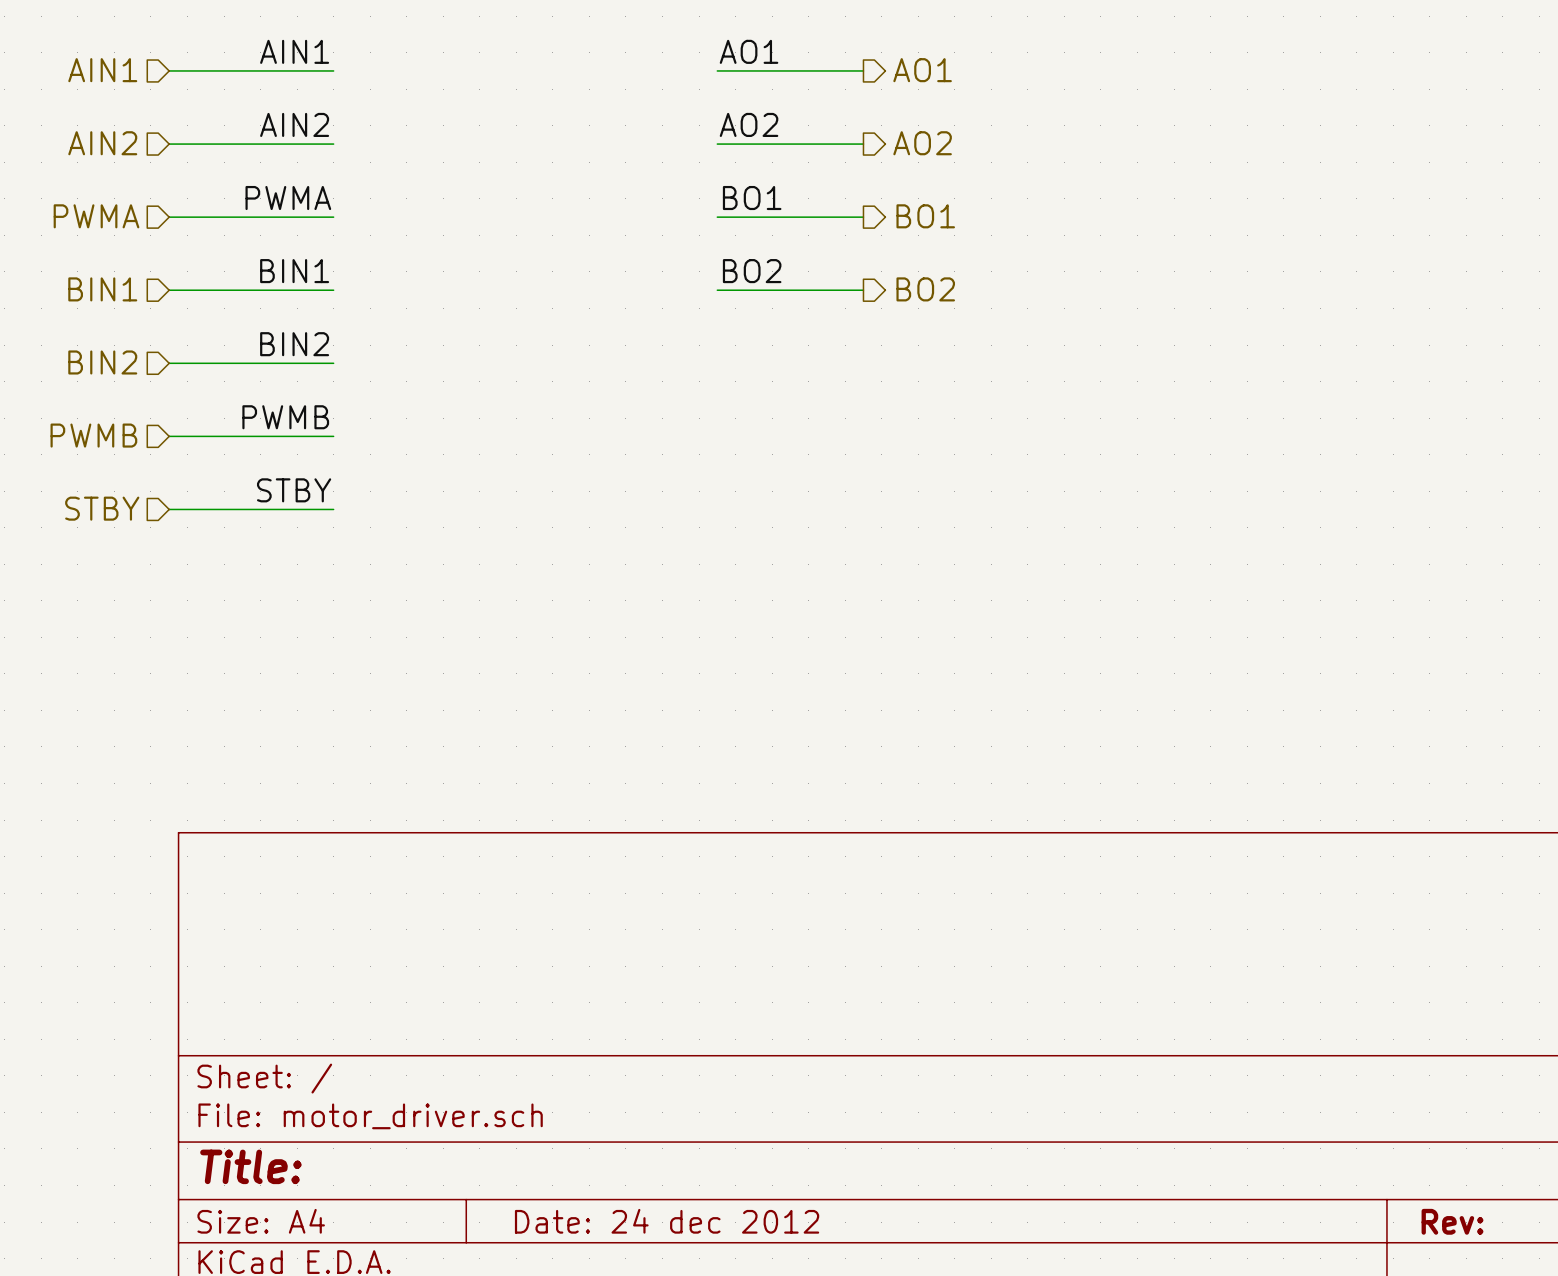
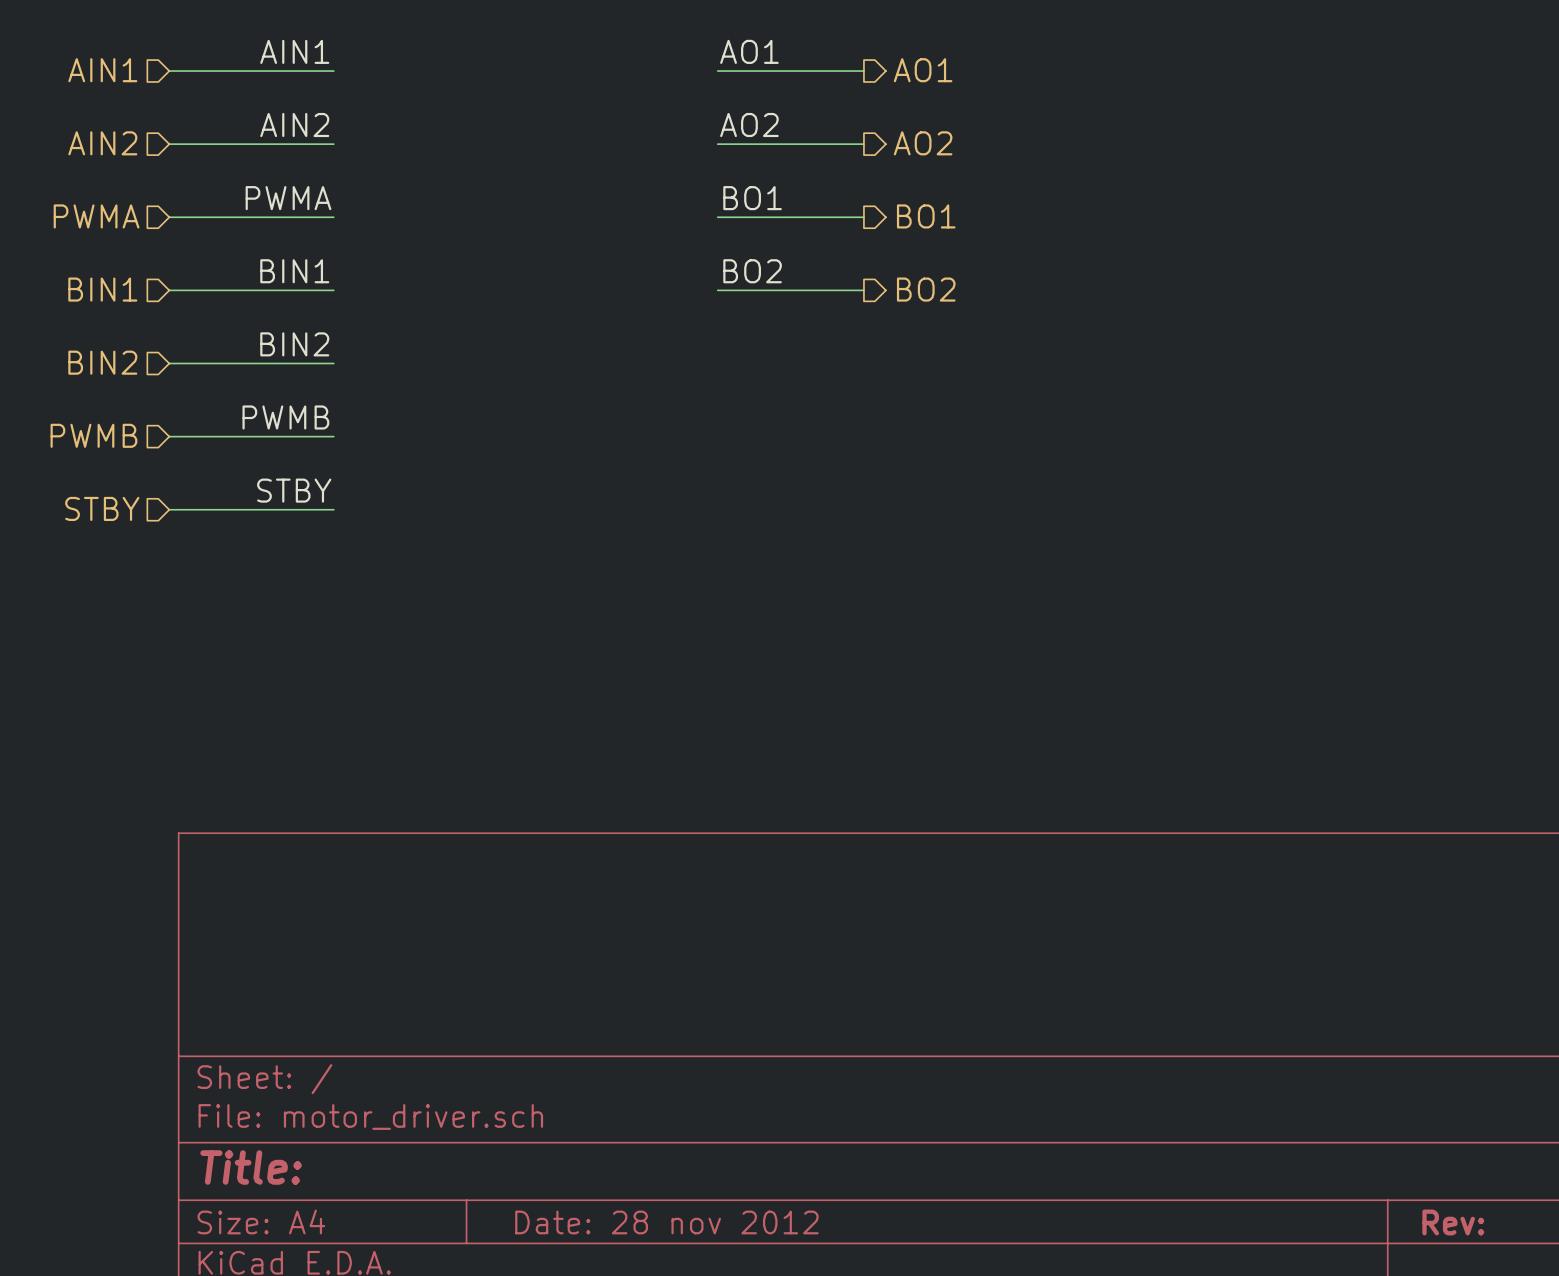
title block: Date: 24 dec 2012 (667, 1221) -> Date: 28 nov 2012 (666, 1222)

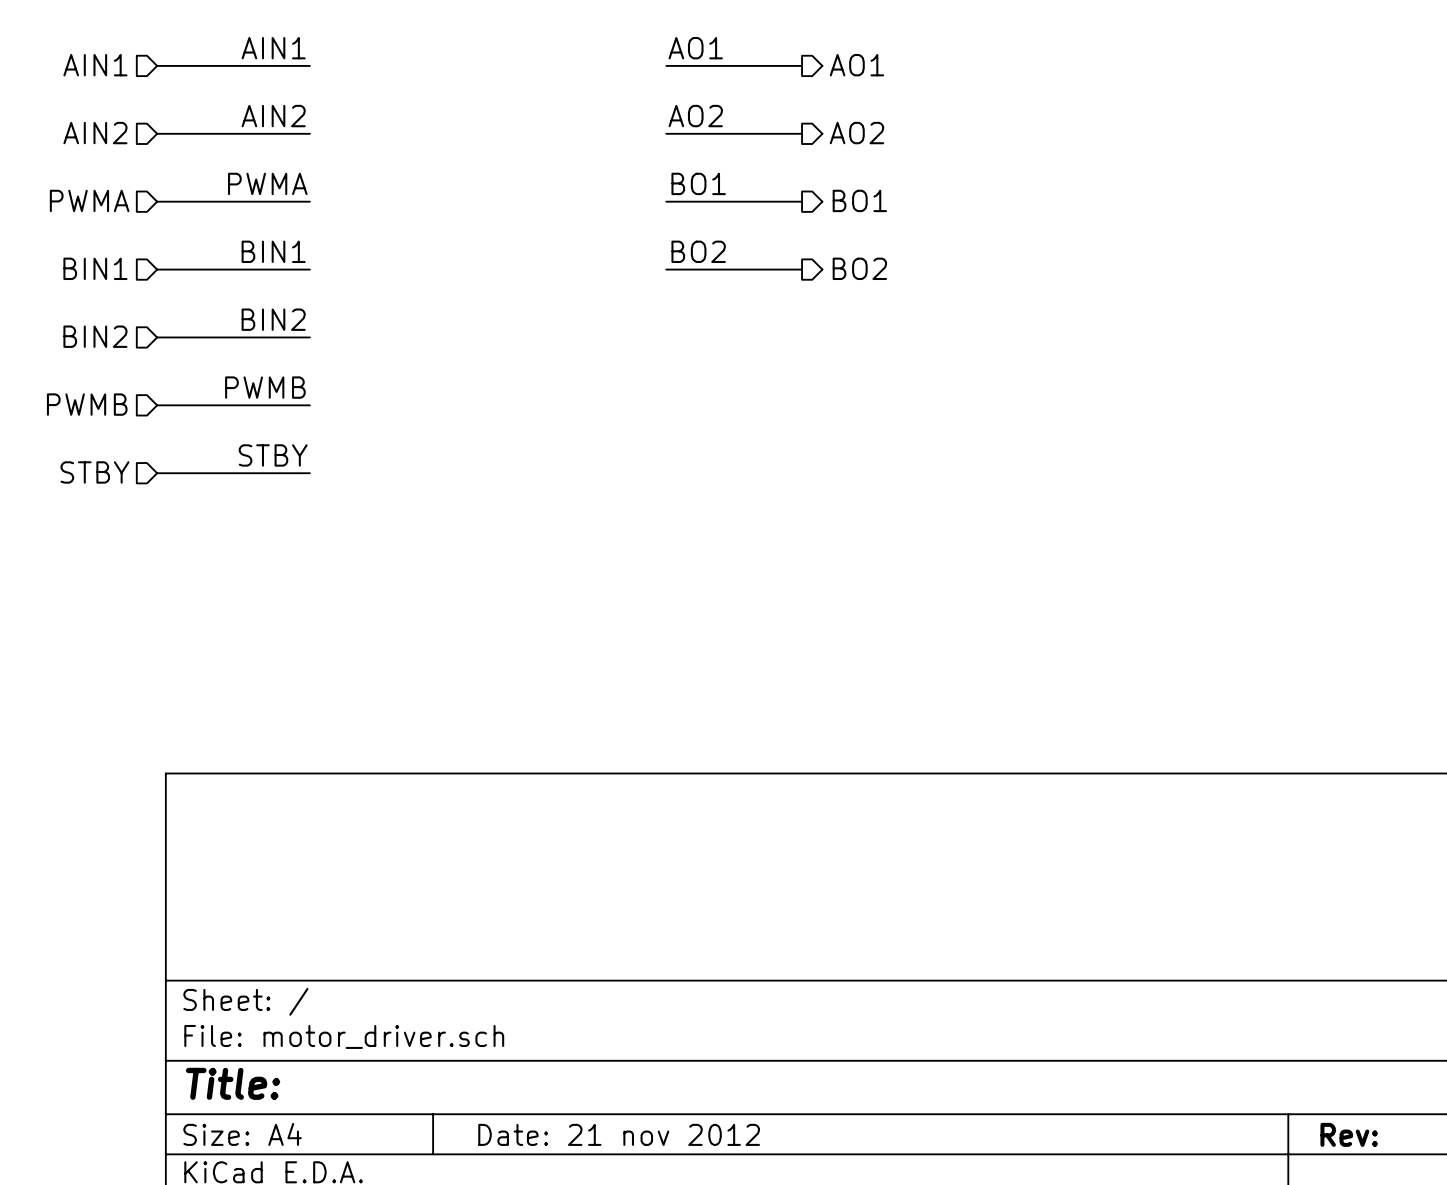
title block: Date: 28 nov 2012 (666, 1222) -> Date: 21 nov 2012 (619, 1134)

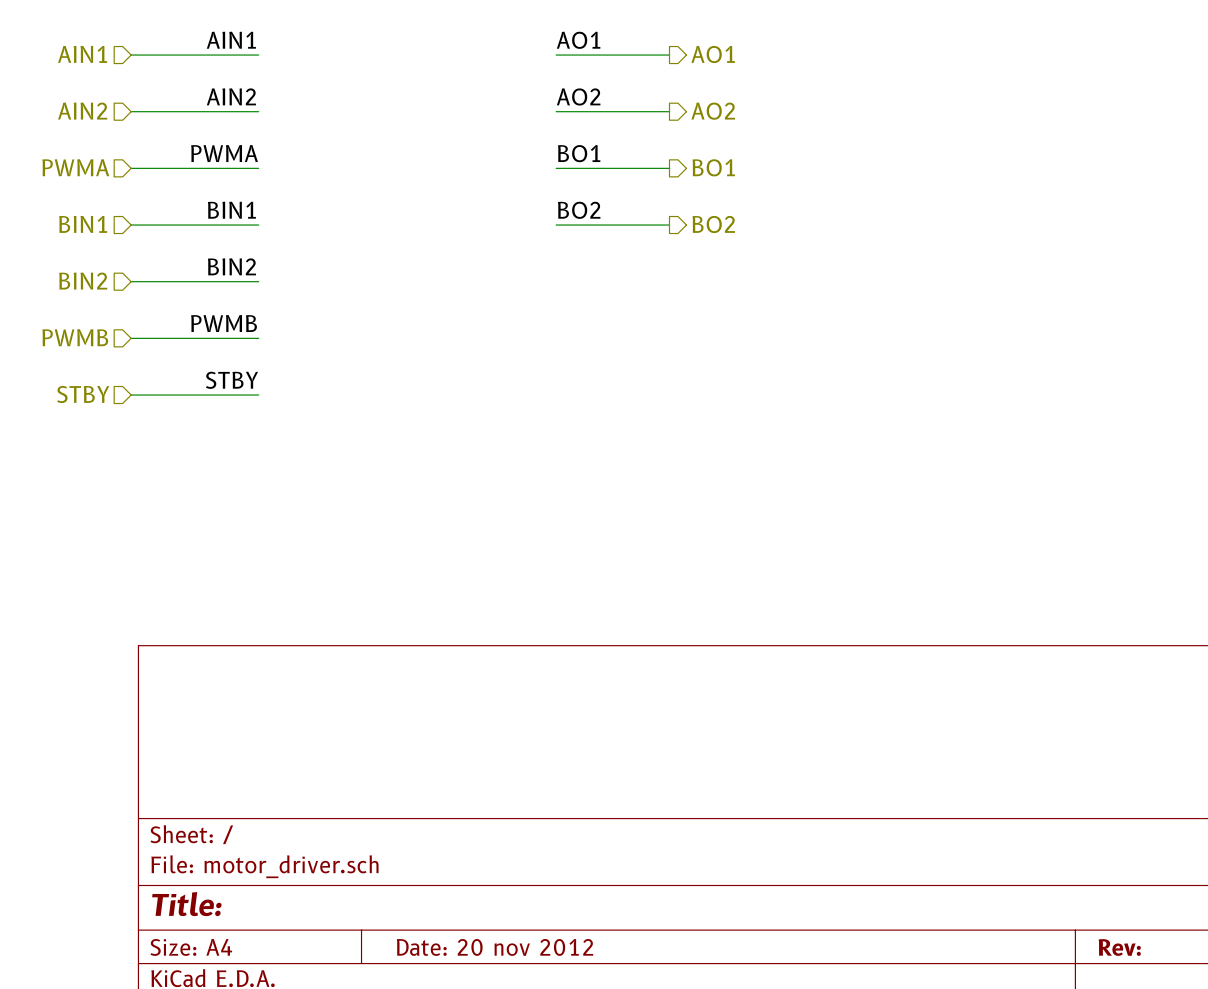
title block: Date: 21 nov 2012 (619, 1134) -> Date: 20 nov 2012 (495, 947)

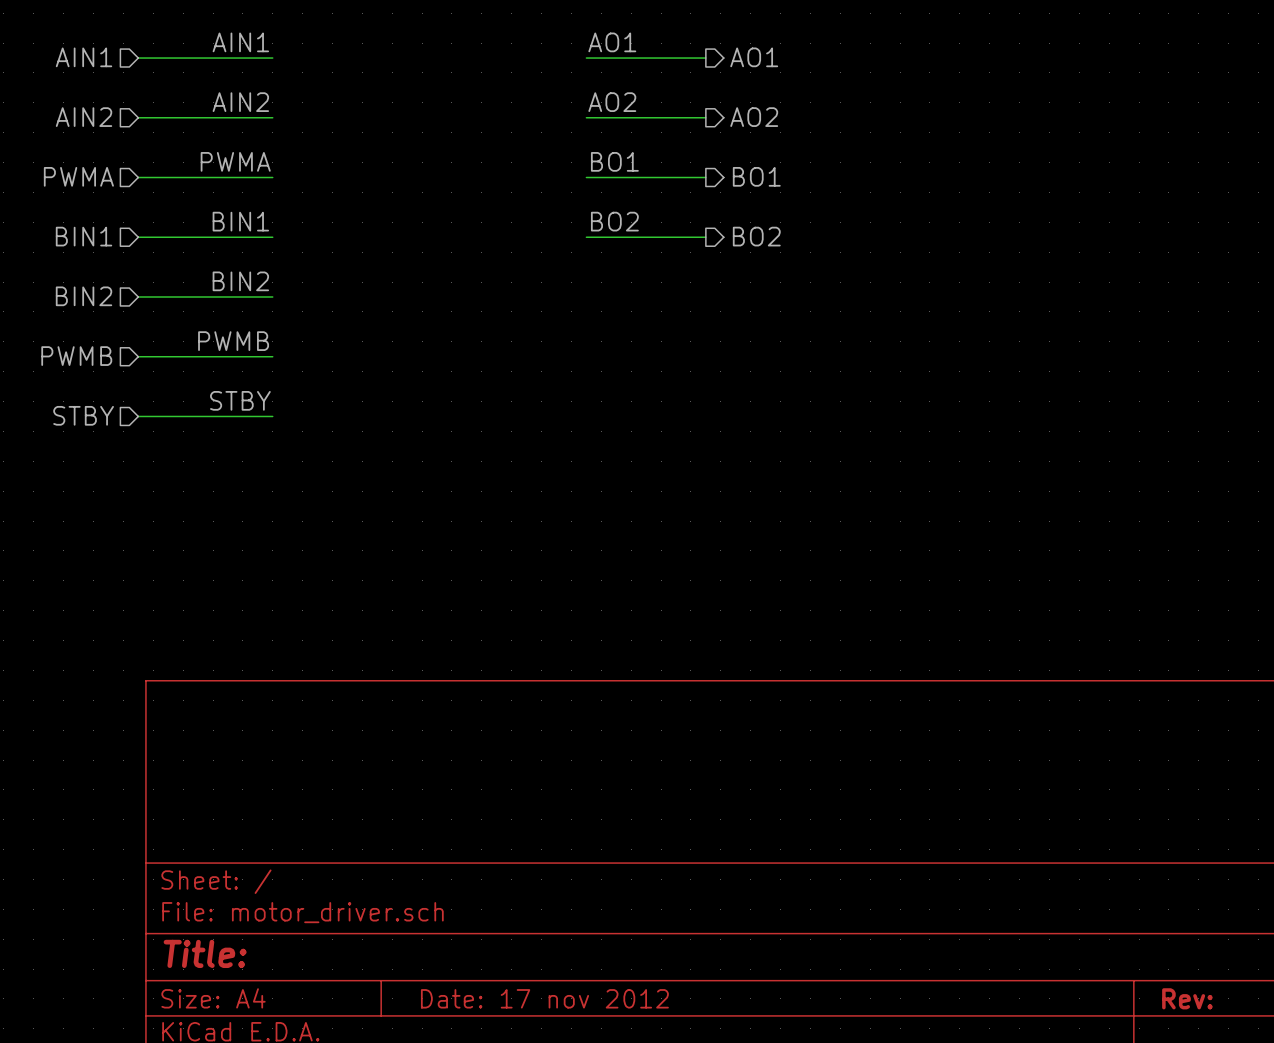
title block: Date: 20 nov 2012 (495, 947) -> Date: 17 nov 2012 (544, 998)

